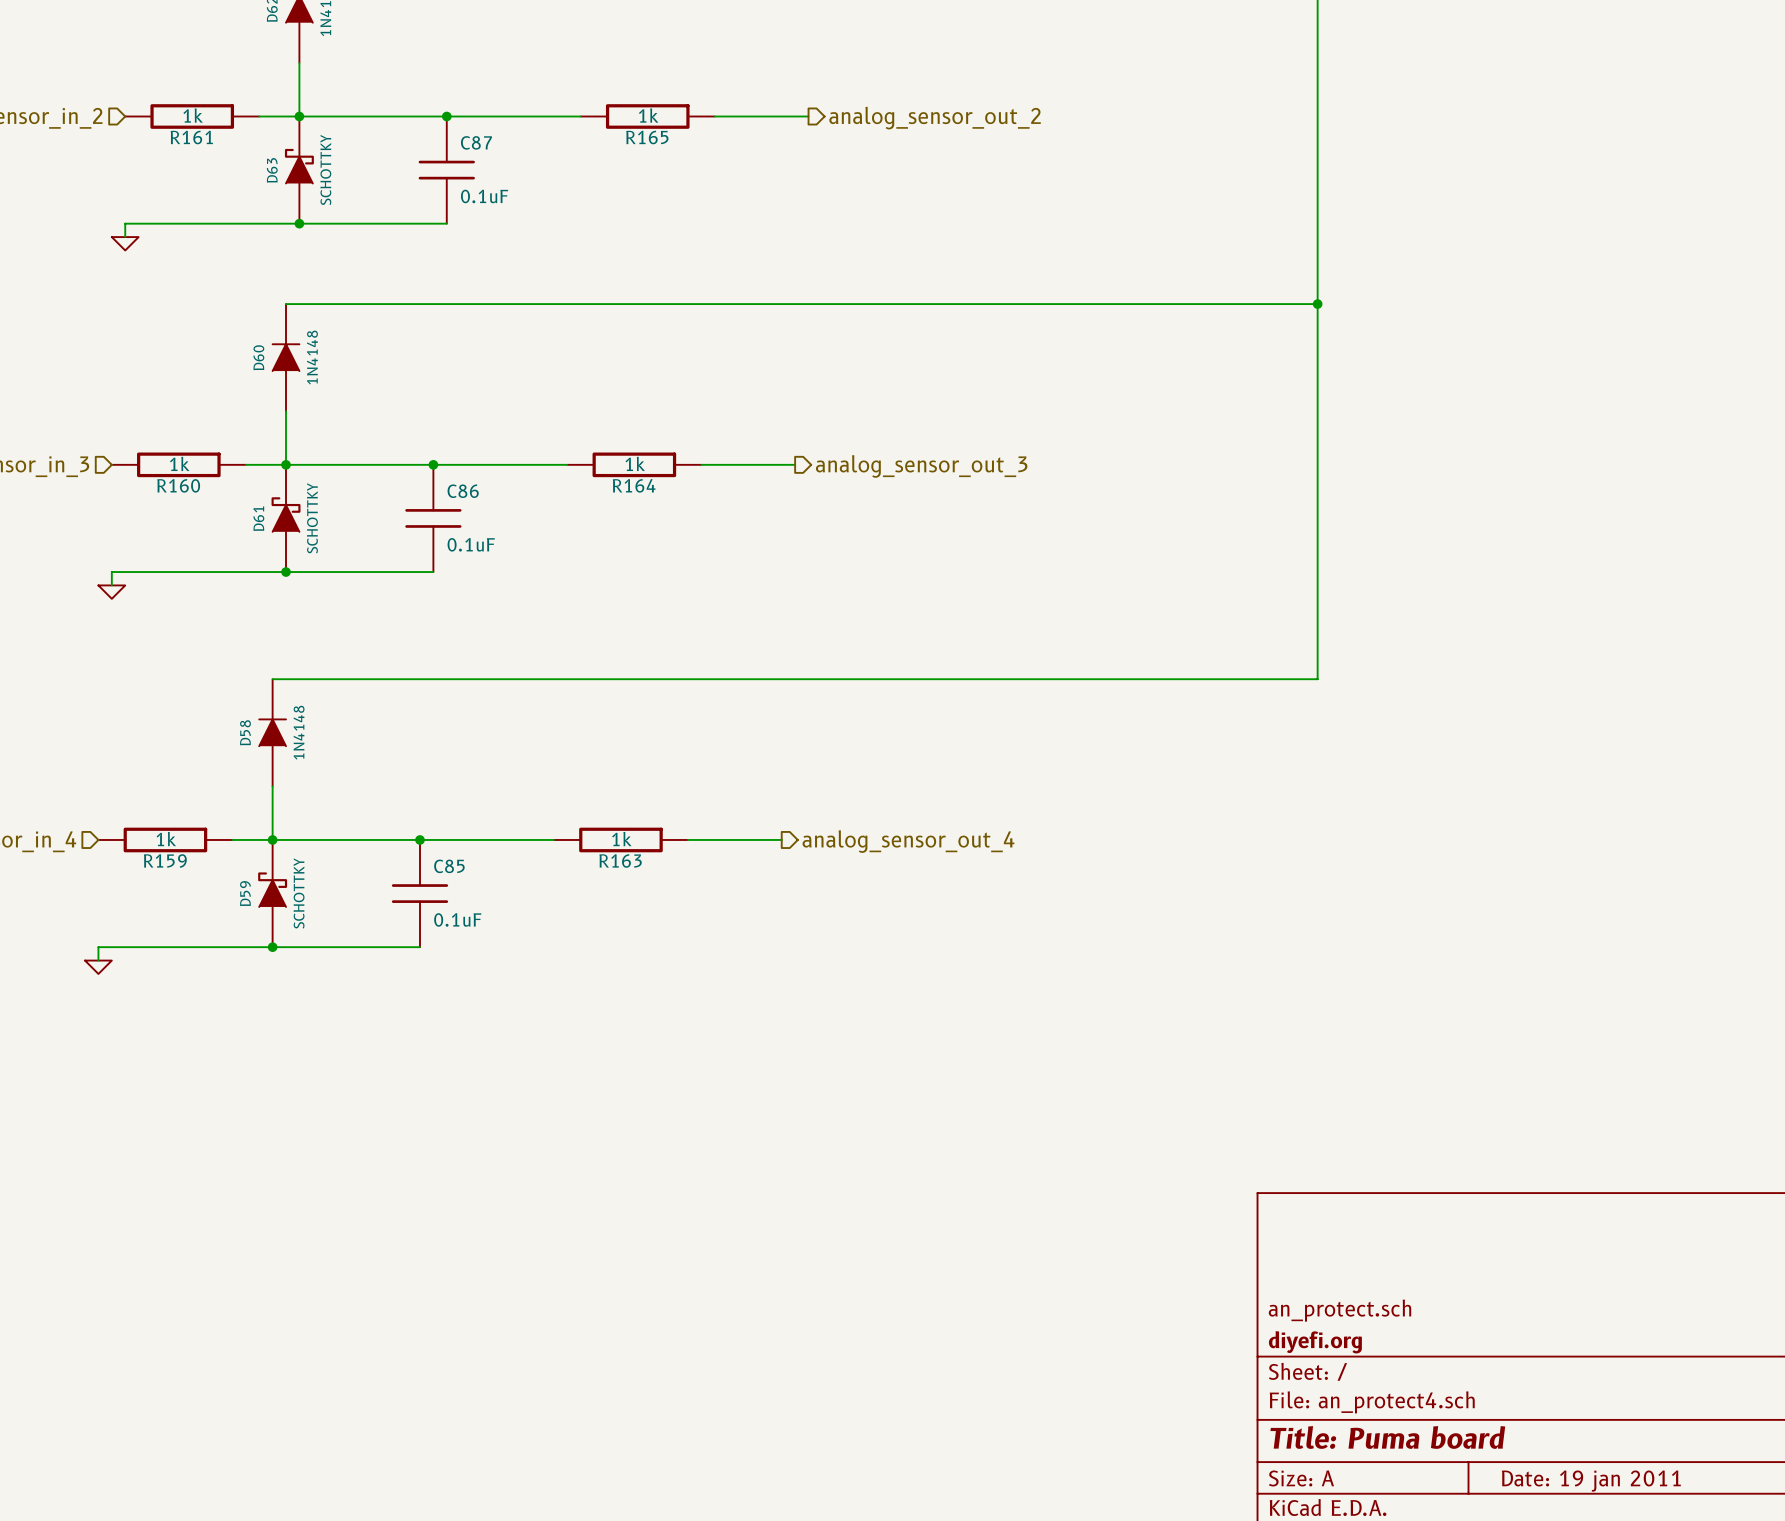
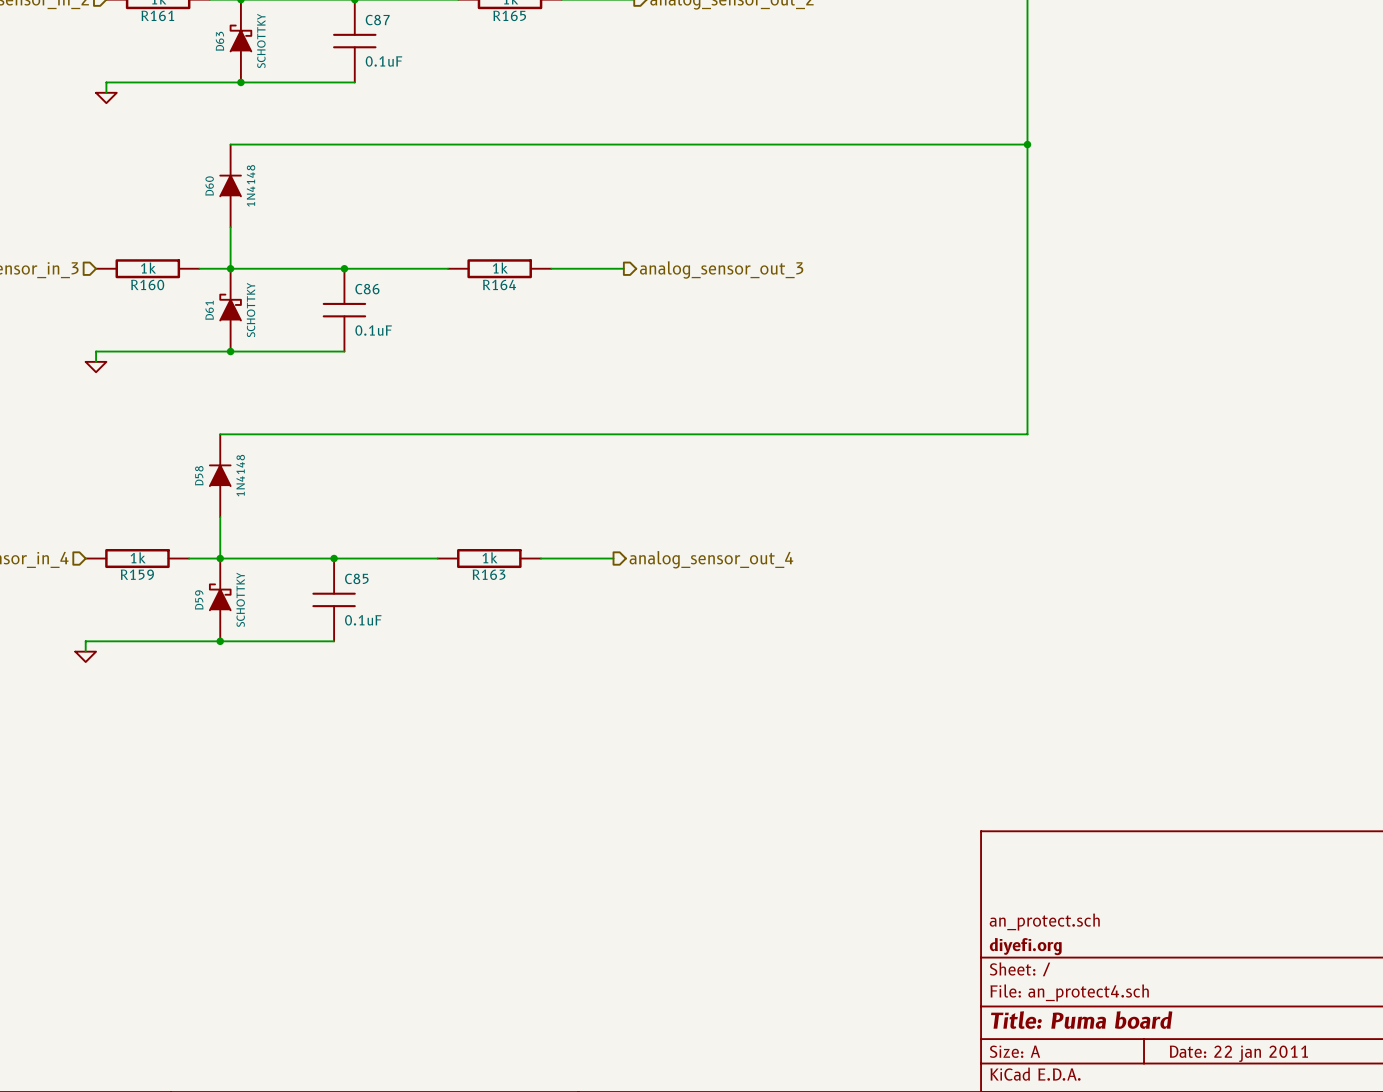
title block: Date: 19 jan 2011 (1591, 1481) -> Date: 22 jan 2011 (1238, 1053)

